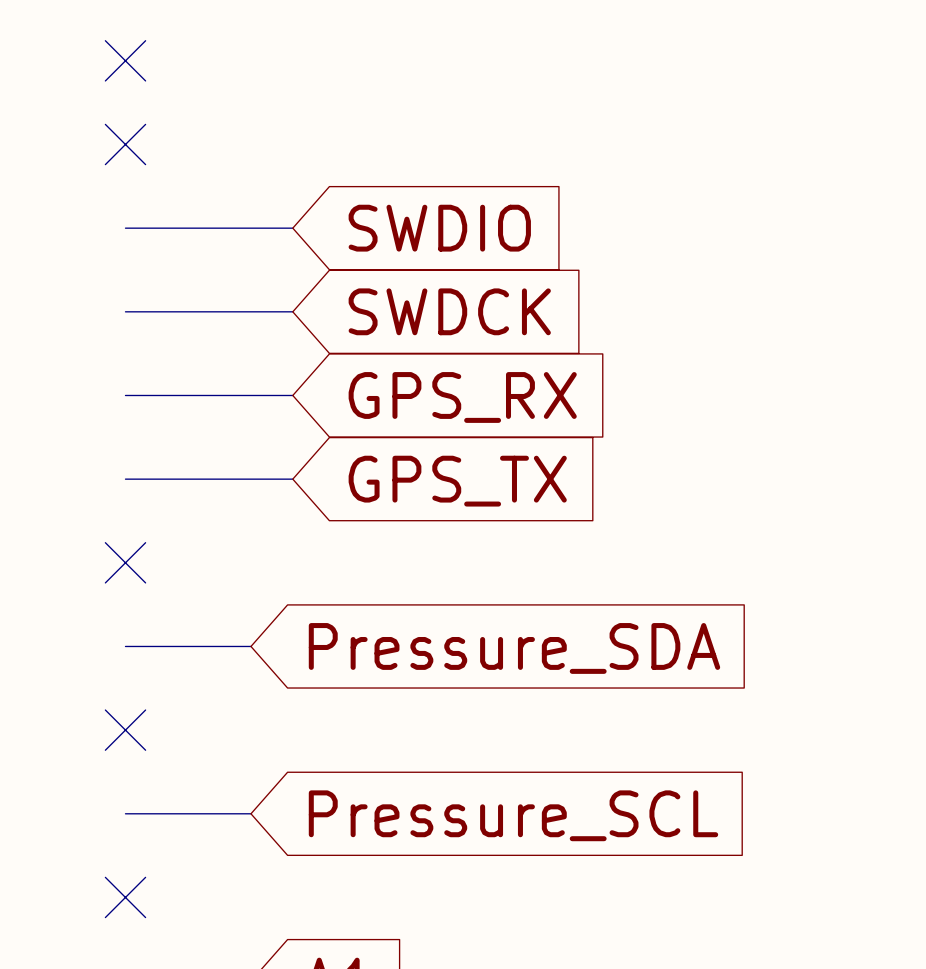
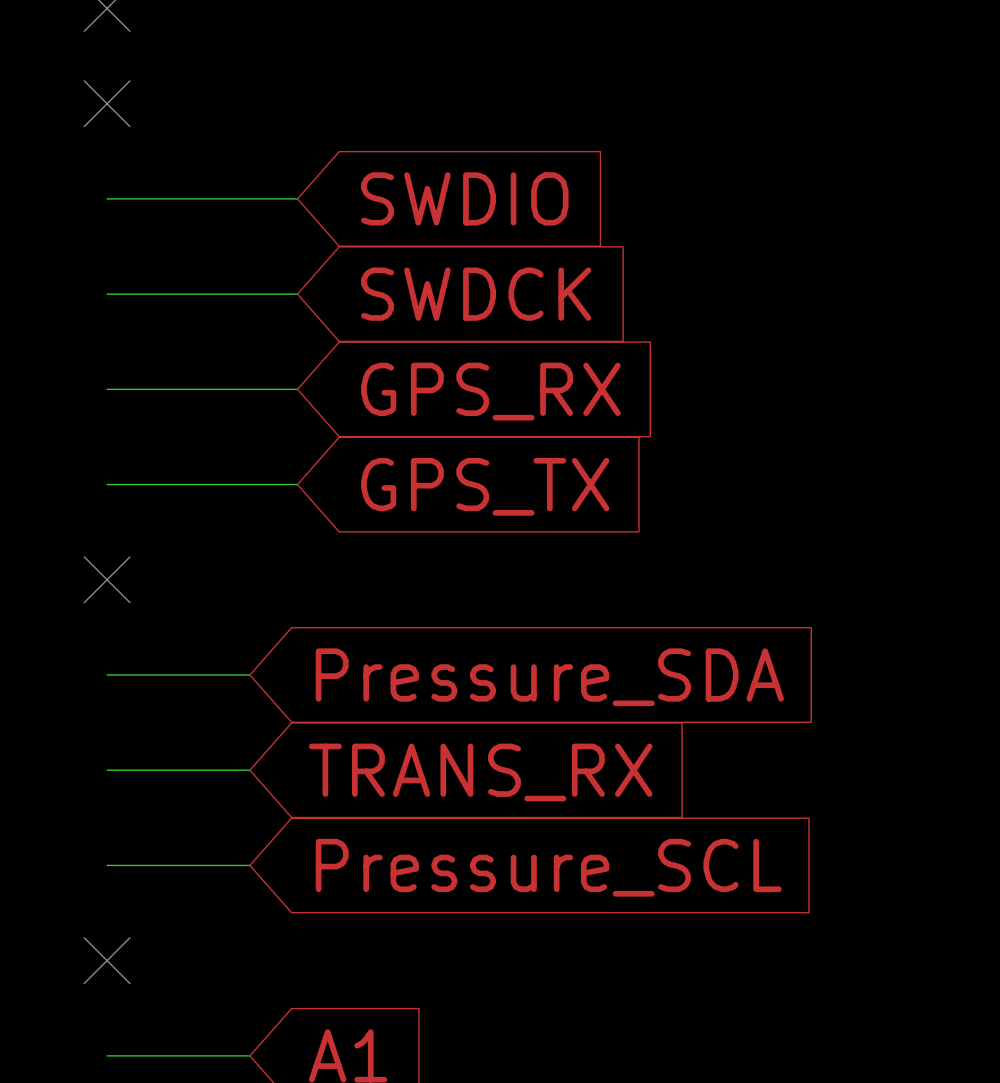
wire: none -> (107, 770) (249, 770)
no-connect mark: (125, 730) -> none
global label: none -> TRANS_RX (480, 772)

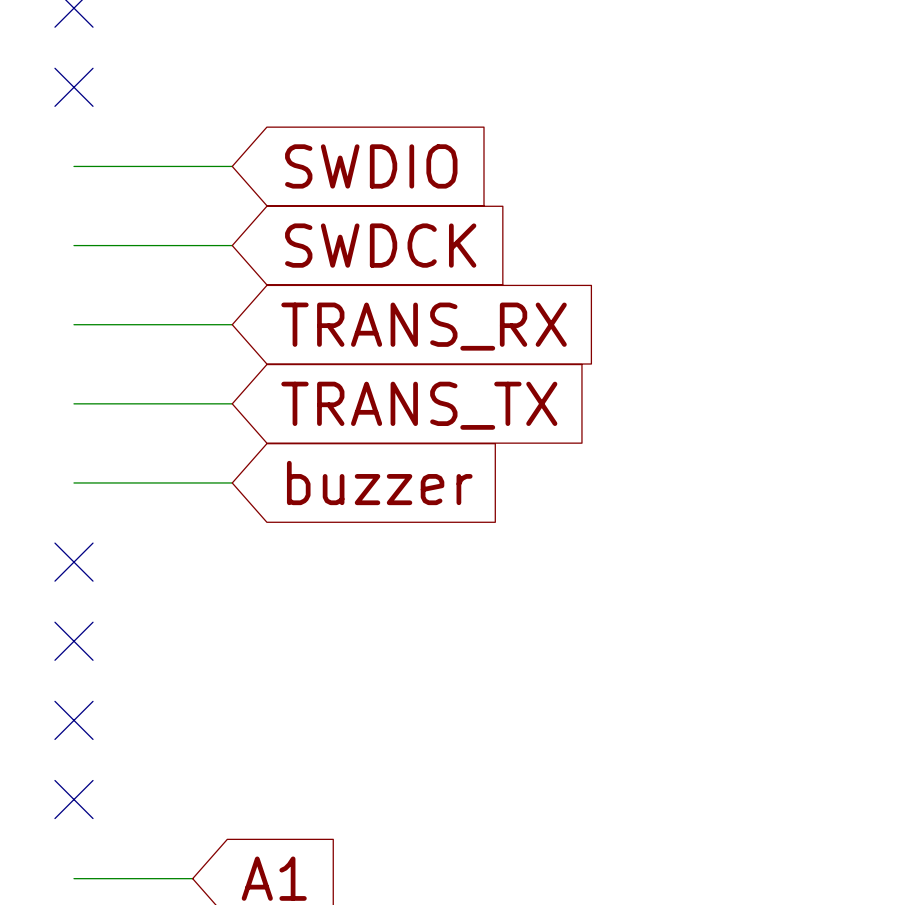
global label: GPS_RX (490, 391) -> TRANS_RX (424, 326)
global label: GPS_TX (485, 486) -> TRANS_TX (419, 405)
wire: none -> (73, 482) (232, 482)
no-connect mark: (107, 579) -> none
global label: none -> buzzer (379, 482)
wire: (107, 675) (249, 675) -> none
no-connect mark: none -> (73, 562)
global label: Pressure_SDA (549, 677) -> none
wire: (107, 770) (249, 770) -> none
no-connect mark: none -> (73, 641)
global label: TRANS_RX (480, 772) -> none
wire: (107, 865) (249, 865) -> none
no-connect mark: none -> (73, 720)
global label: Pressure_SCL (548, 867) -> none

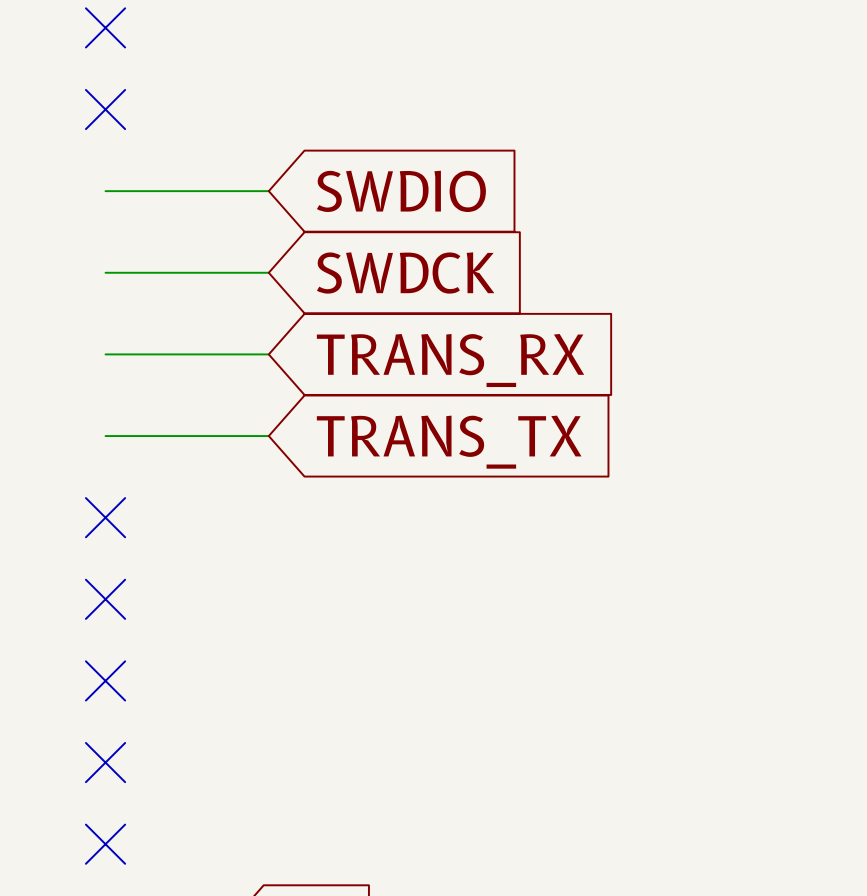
wire: (73, 482) (232, 482) -> none
no-connect mark: none -> (105, 517)
global label: buzzer (379, 482) -> none

